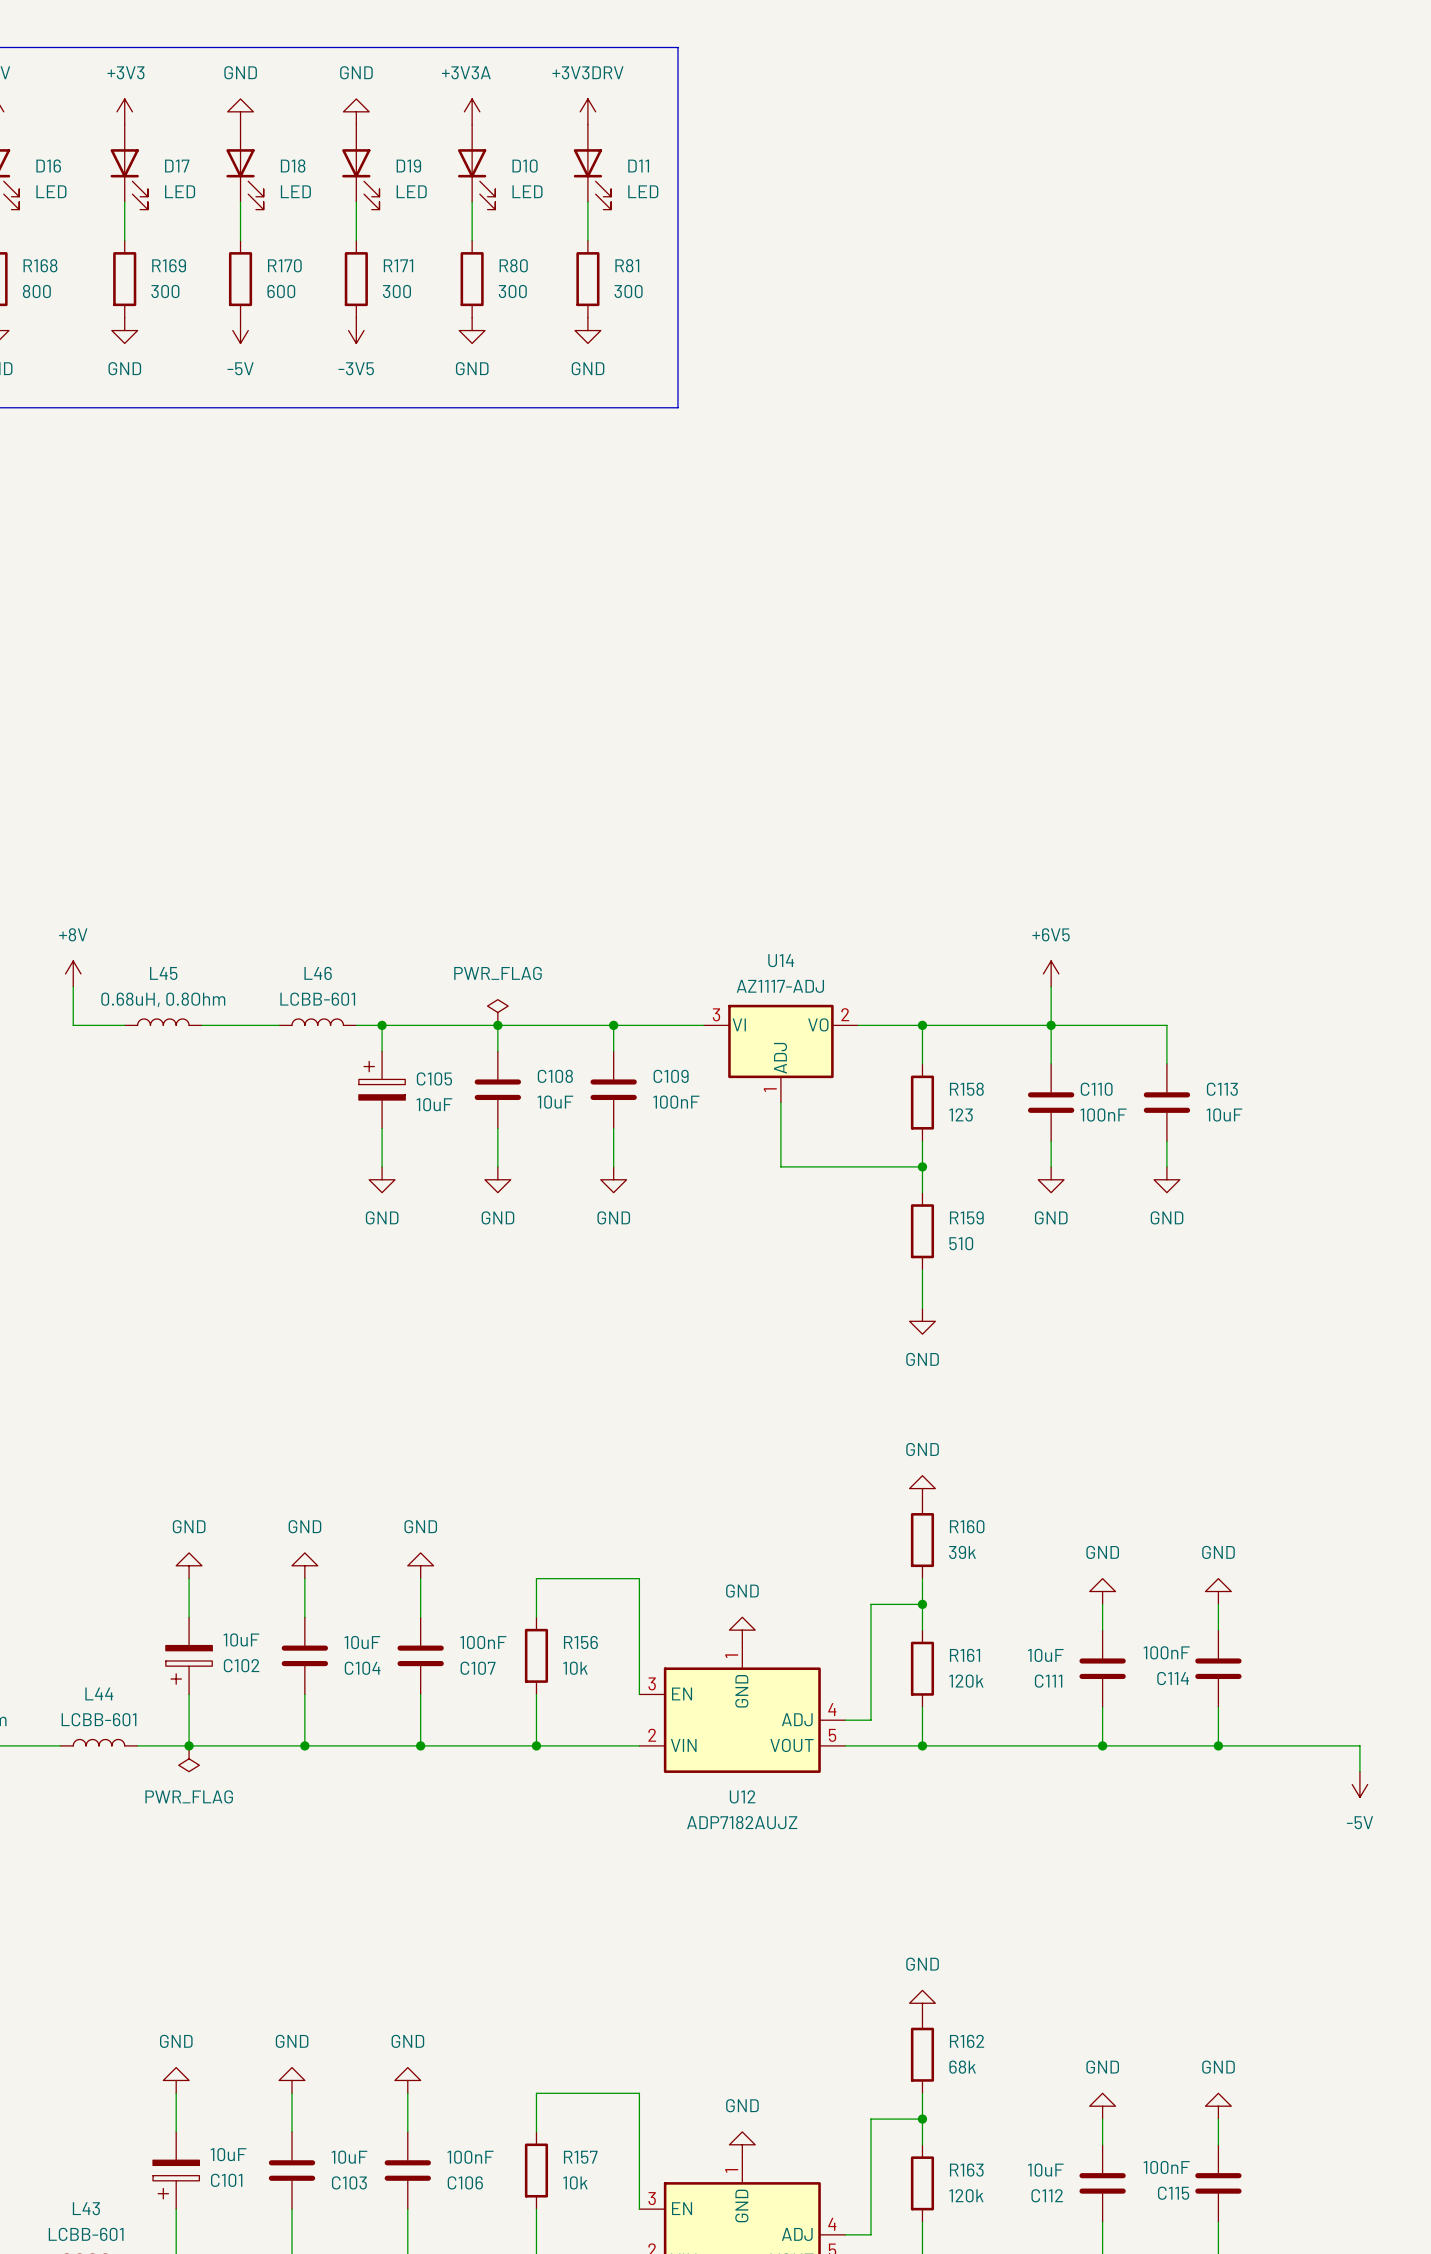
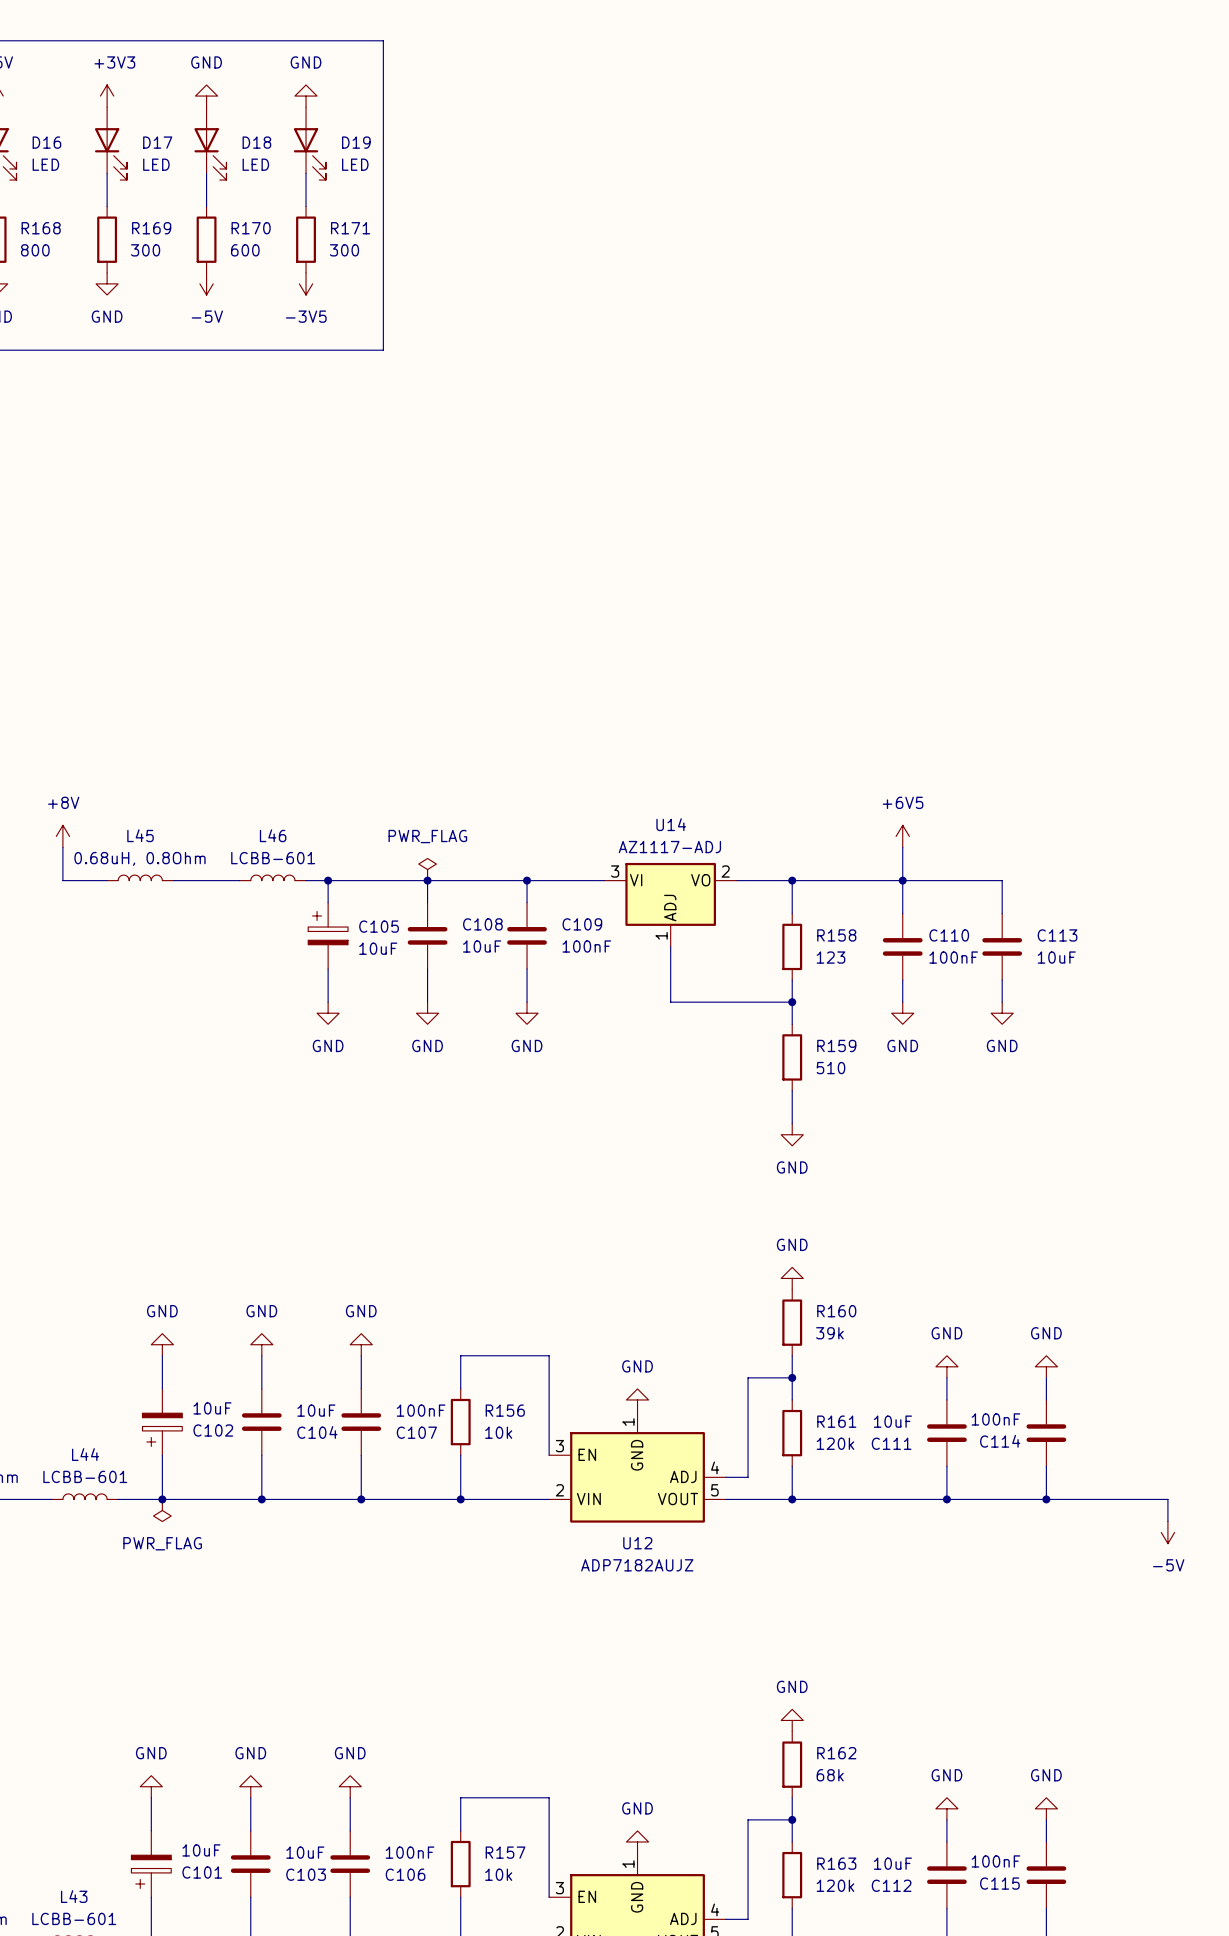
line: (446, 47) (677, 47) (677, 407) (446, 407) -> (383, 40) (383, 350)
power symbol: +3V3A (472, 111) -> none
power symbol: +3V3DRV (587, 111) -> none
D10: LED (476, 167) -> none
D11: LED (592, 167) -> none
wire: (472, 201) (472, 240) -> none
wire: (587, 201) (587, 240) -> none
R80: 300 (472, 279) -> none
R81: 300 (587, 279) -> none
power symbol: GND (472, 330) -> none
power symbol: GND (587, 330) -> none

